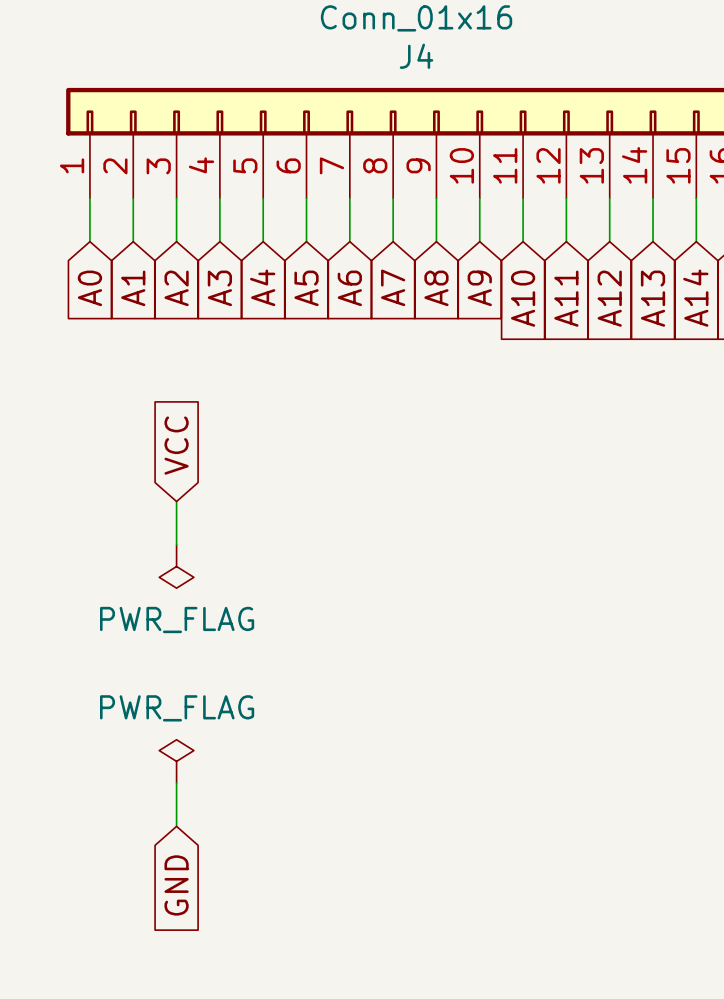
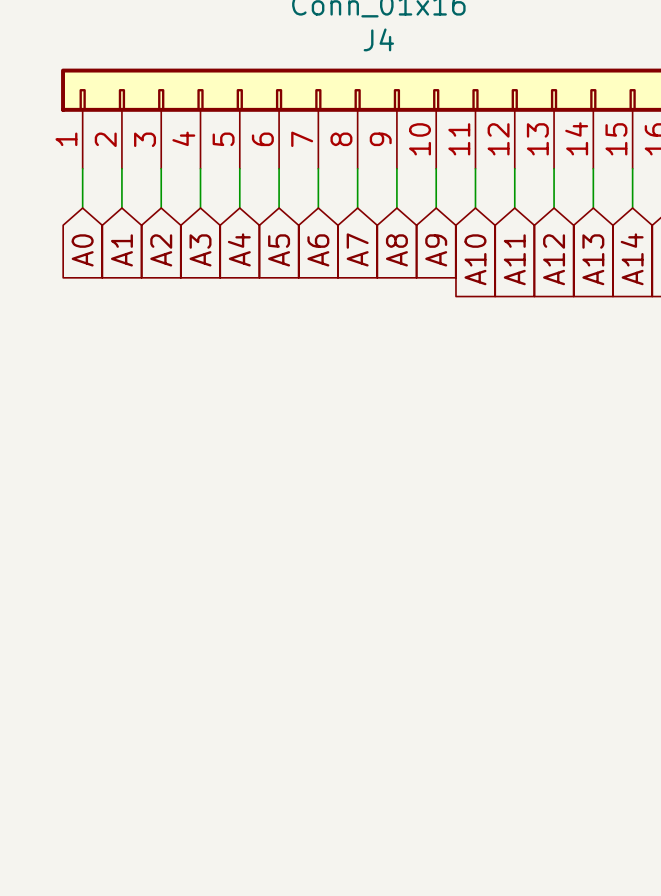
global label: VCC (176, 445) -> none
wire: (176, 501) (176, 544) -> none
power symbol: PWR_FLAG (176, 566) -> none
power symbol: PWR_FLAG (176, 761) -> none
wire: (176, 783) (176, 826) -> none
global label: GND (176, 885) -> none

